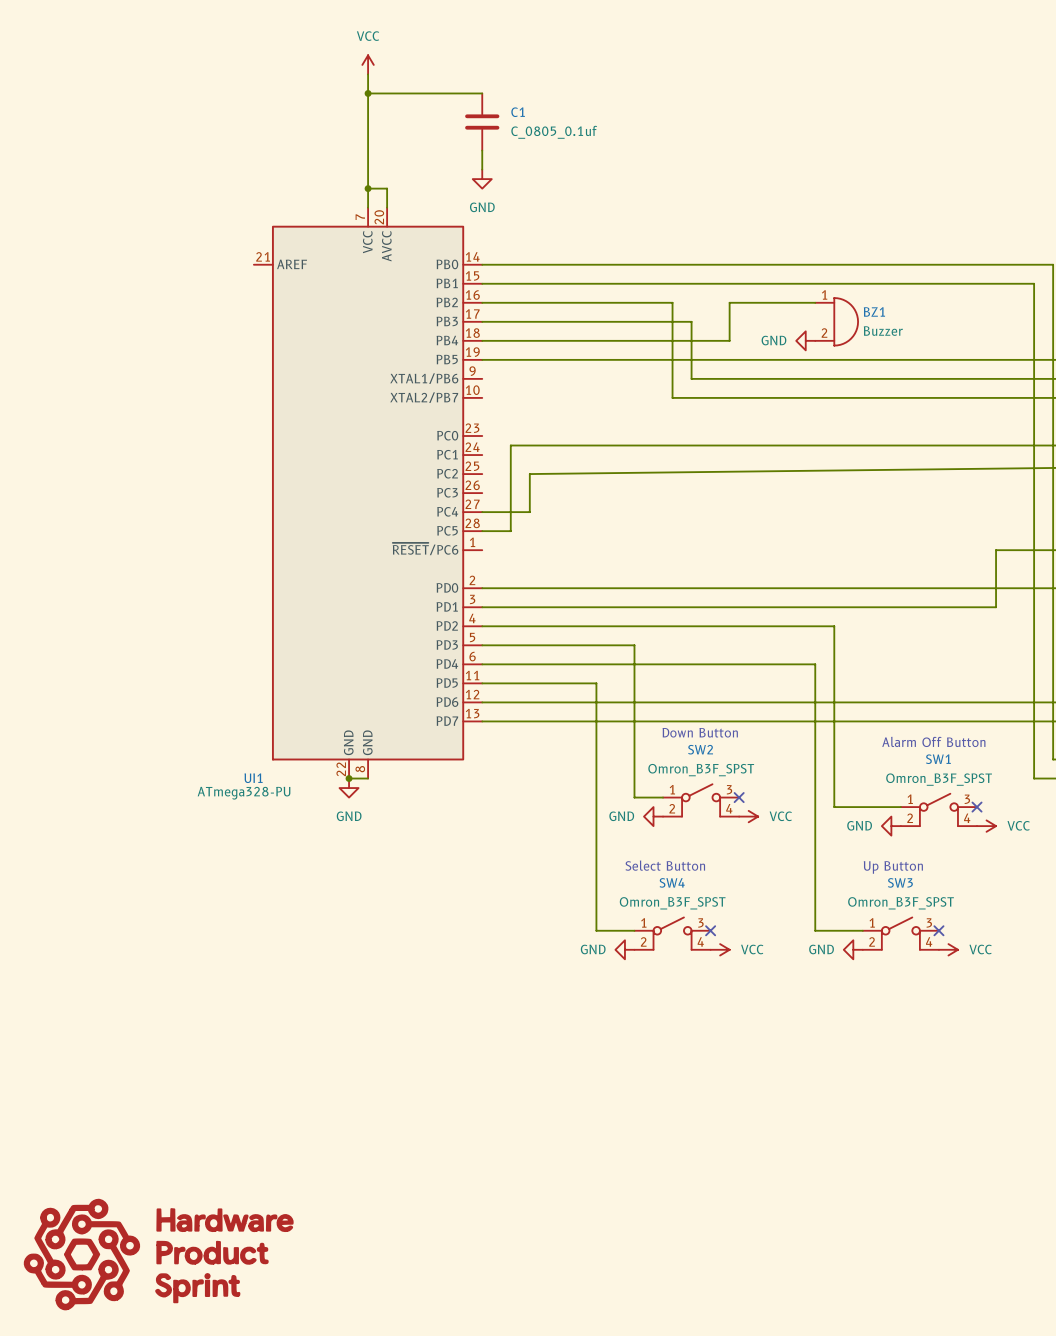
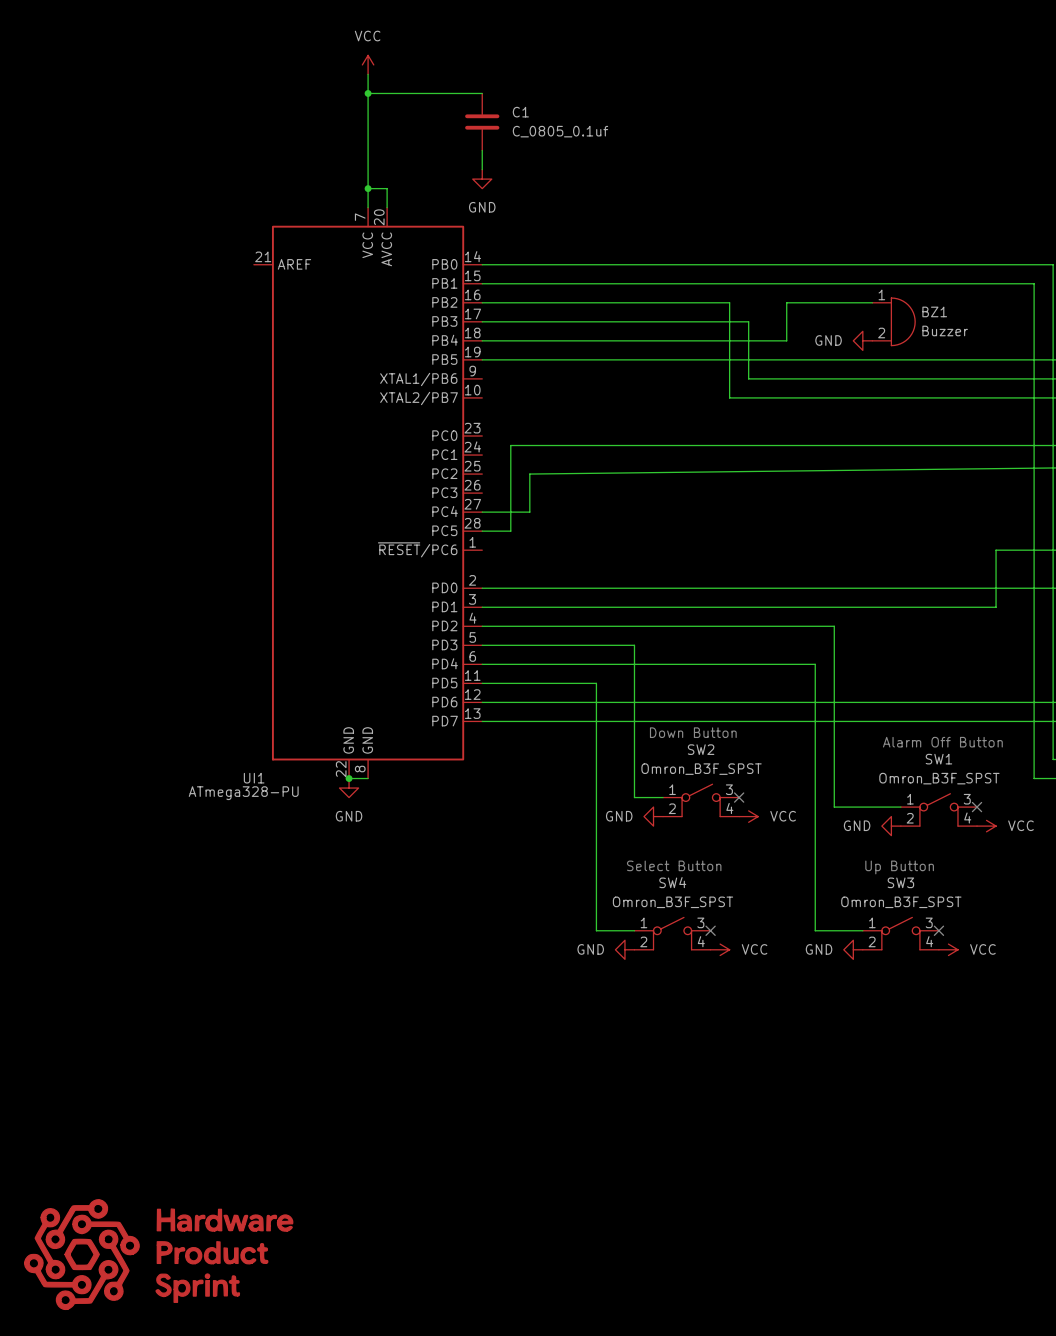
wire: (672, 302) (672, 397) (729, 397) -> (672, 302) (729, 302)
wire: (729, 302) (786, 302) -> (729, 397) (729, 340) (786, 340) (786, 302)
wire: none -> (815, 302) (872, 302)
wire: (691, 321) (691, 378) (748, 378) -> (691, 321) (748, 321) (748, 378)
BZ1 position: (836, 321) -> (893, 321)
power symbol position: GND (805, 340) -> GND (862, 340)

